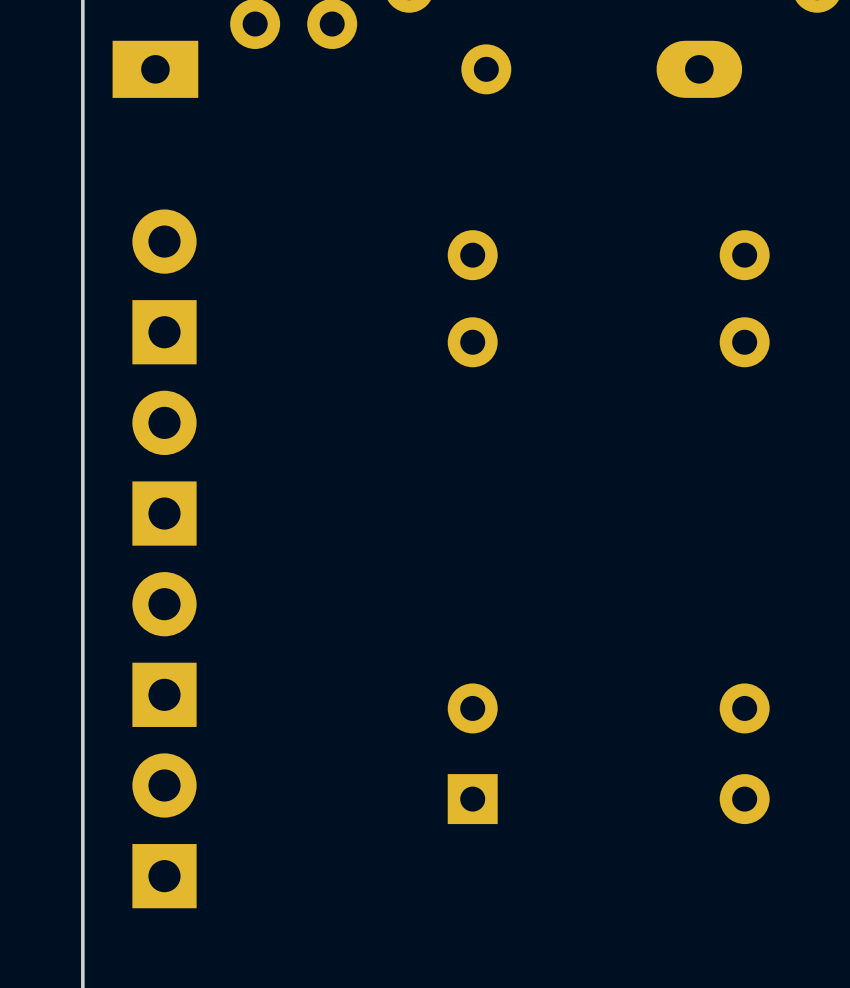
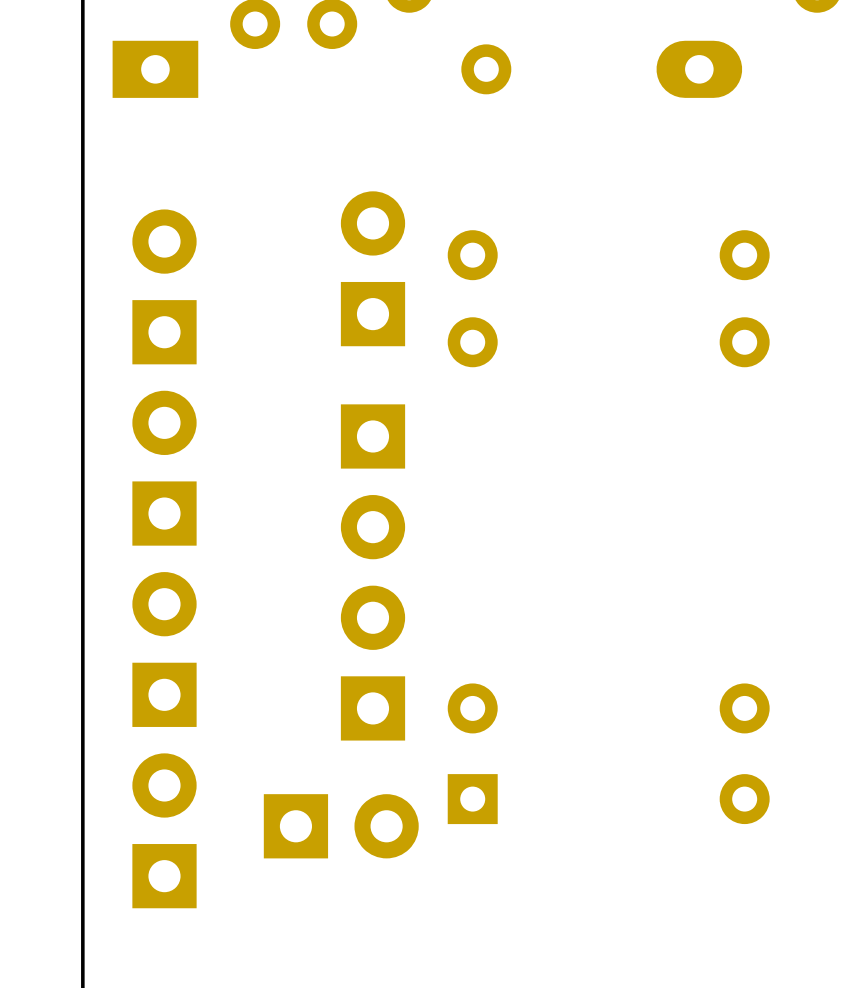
part: none -> (372, 268)
part: none -> (372, 481)
part: none -> (372, 663)
part: none -> (341, 826)

